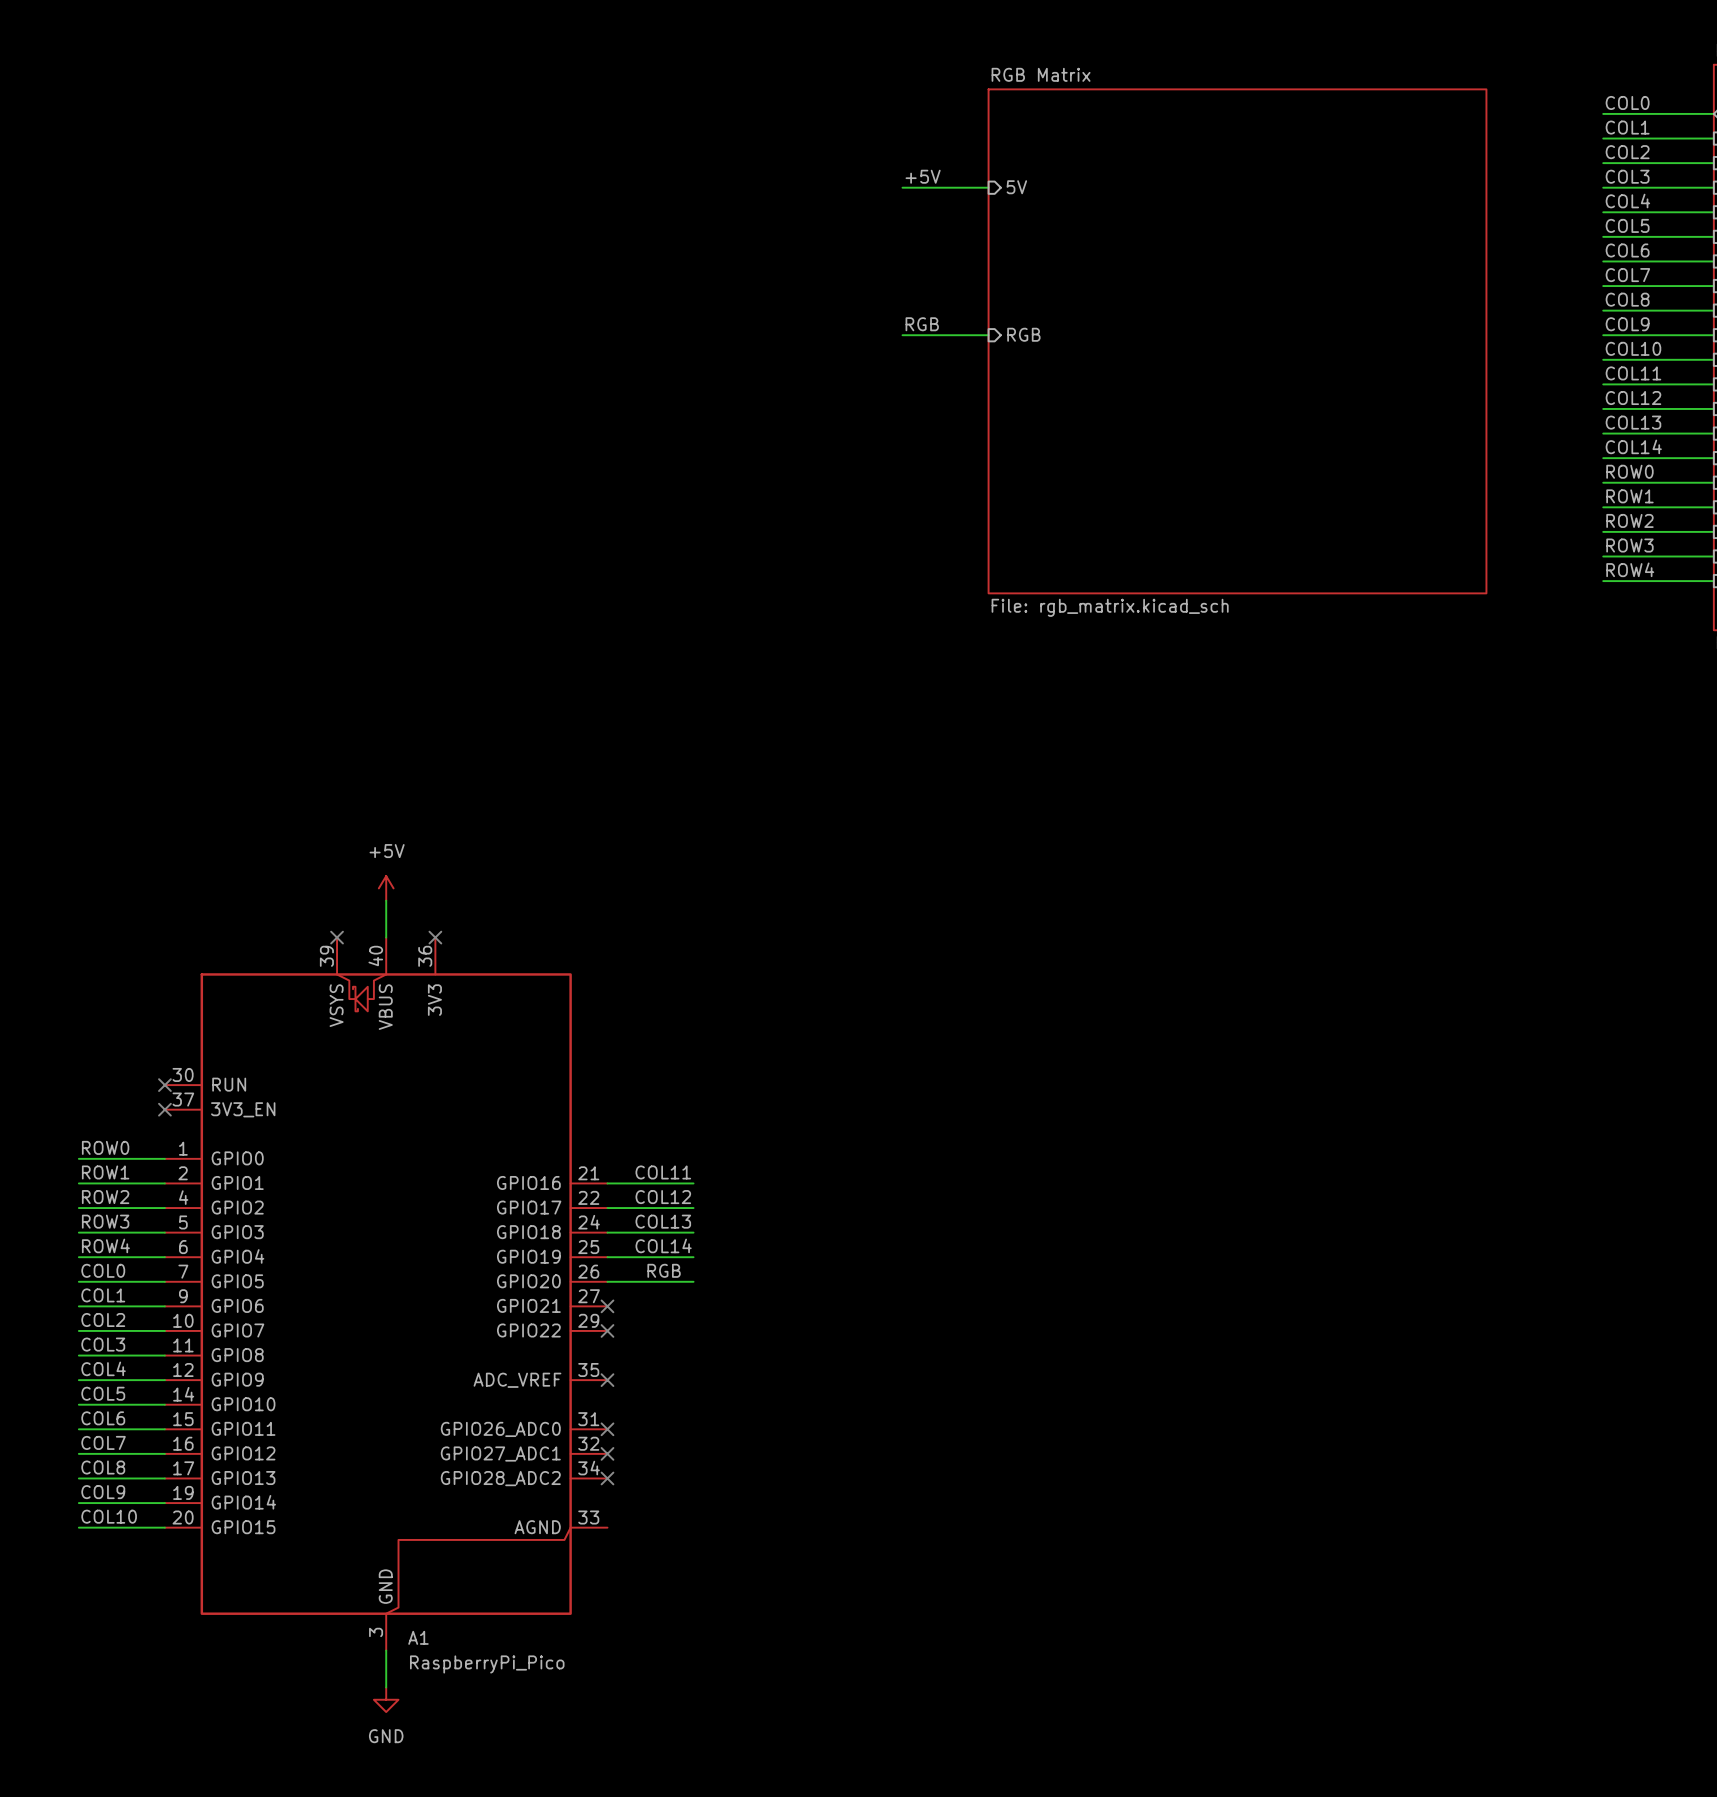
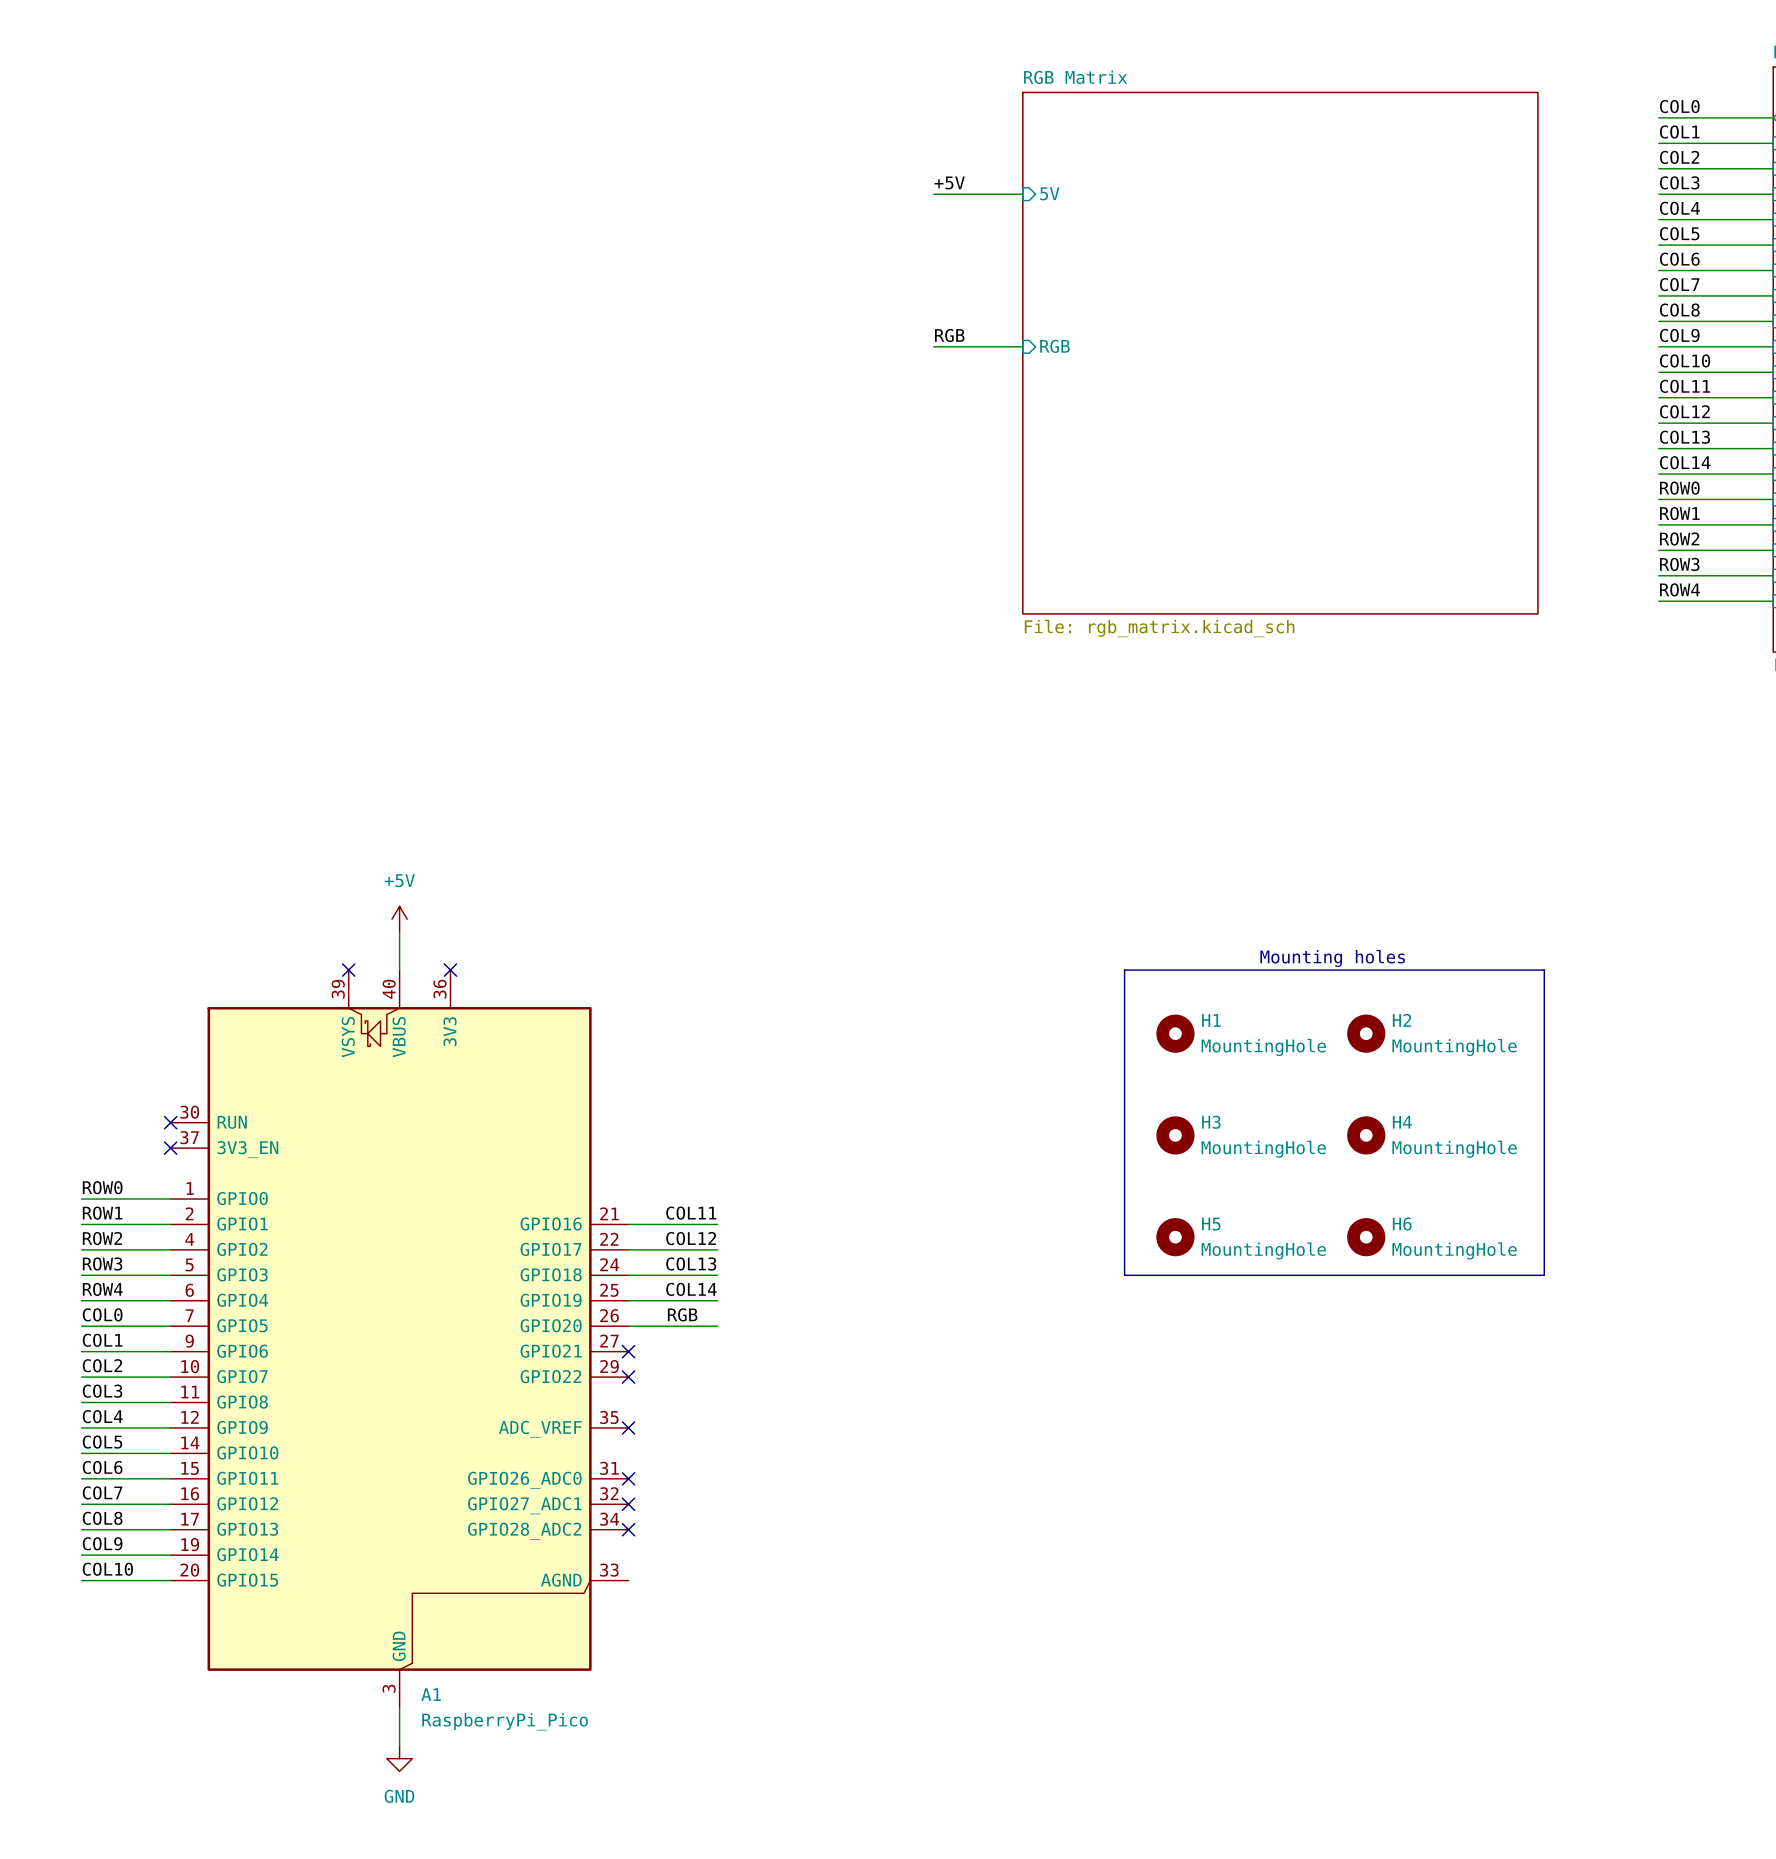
text: none -> Mounting holes (1332, 958)
line: none -> (1124, 970) (1544, 970) (1544, 1275) (1124, 1275) (1124, 970)
H1: none -> MountingHole (1175, 1033)
H2: none -> MountingHole (1366, 1033)
H3: none -> MountingHole (1175, 1135)
H4: none -> MountingHole (1366, 1135)
H5: none -> MountingHole (1175, 1237)
H6: none -> MountingHole (1366, 1237)

